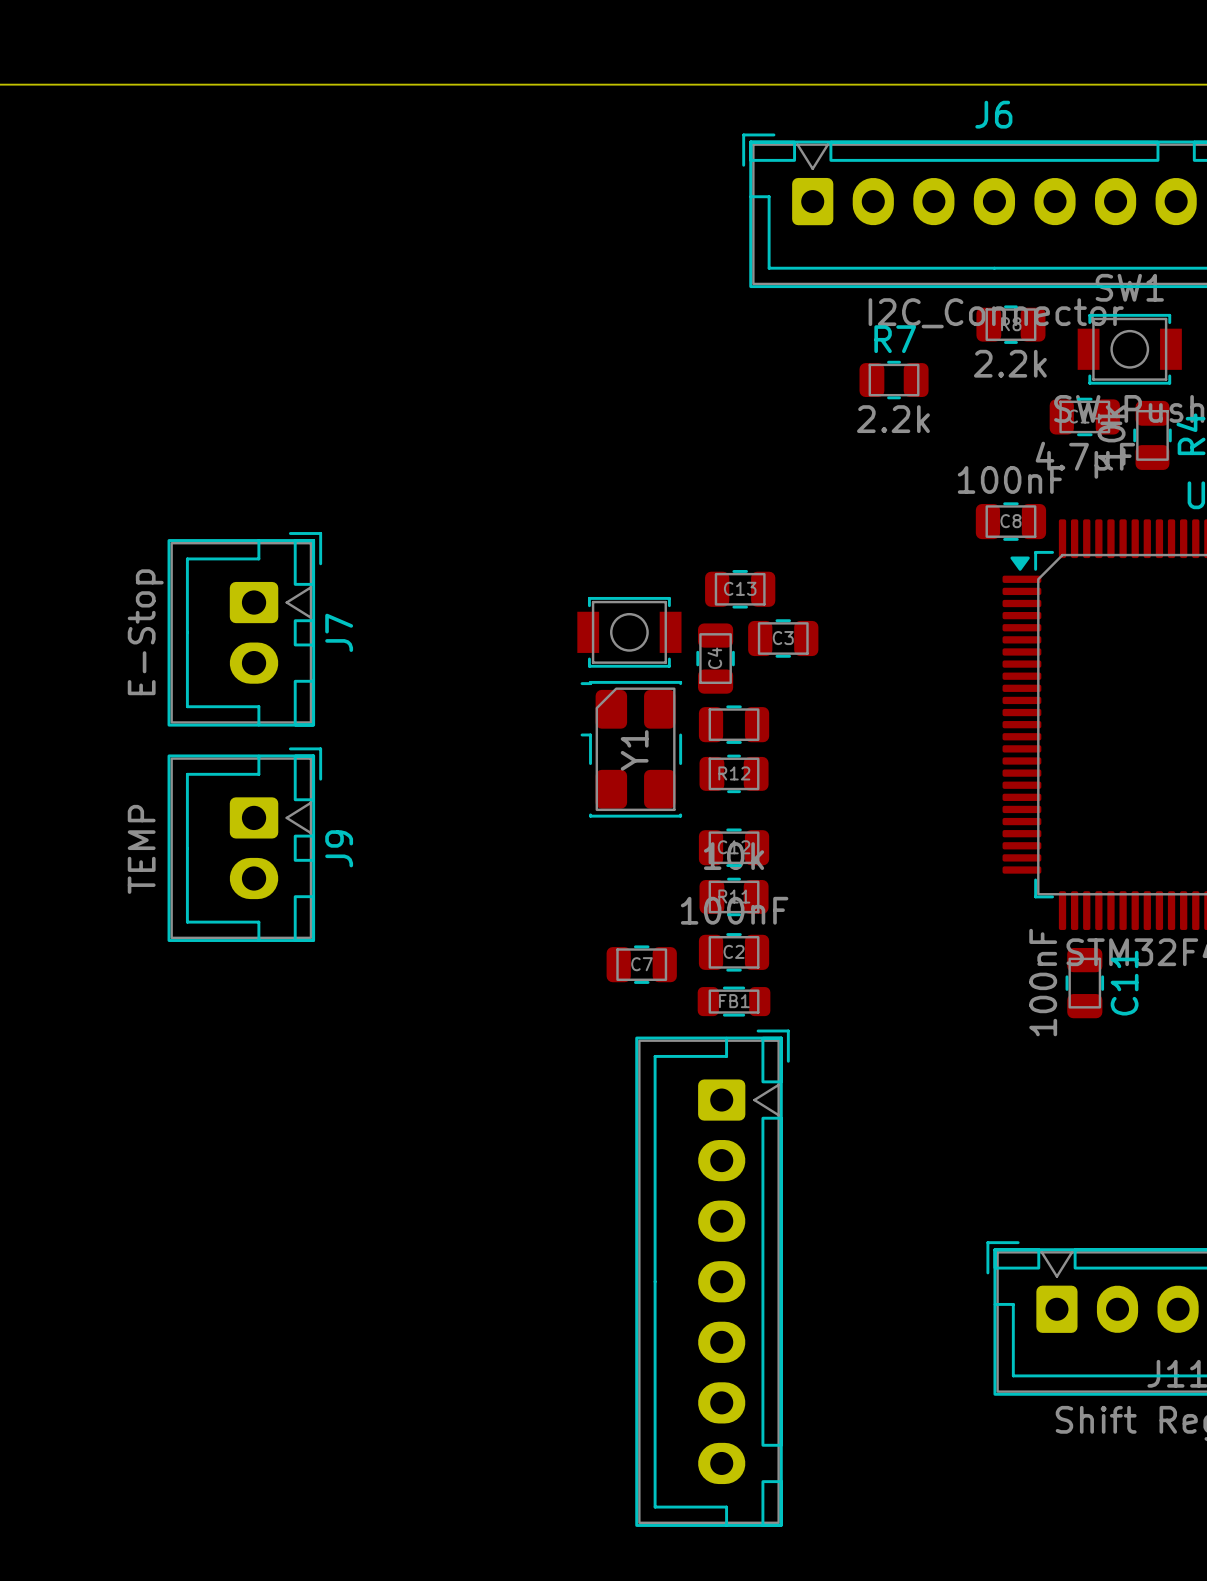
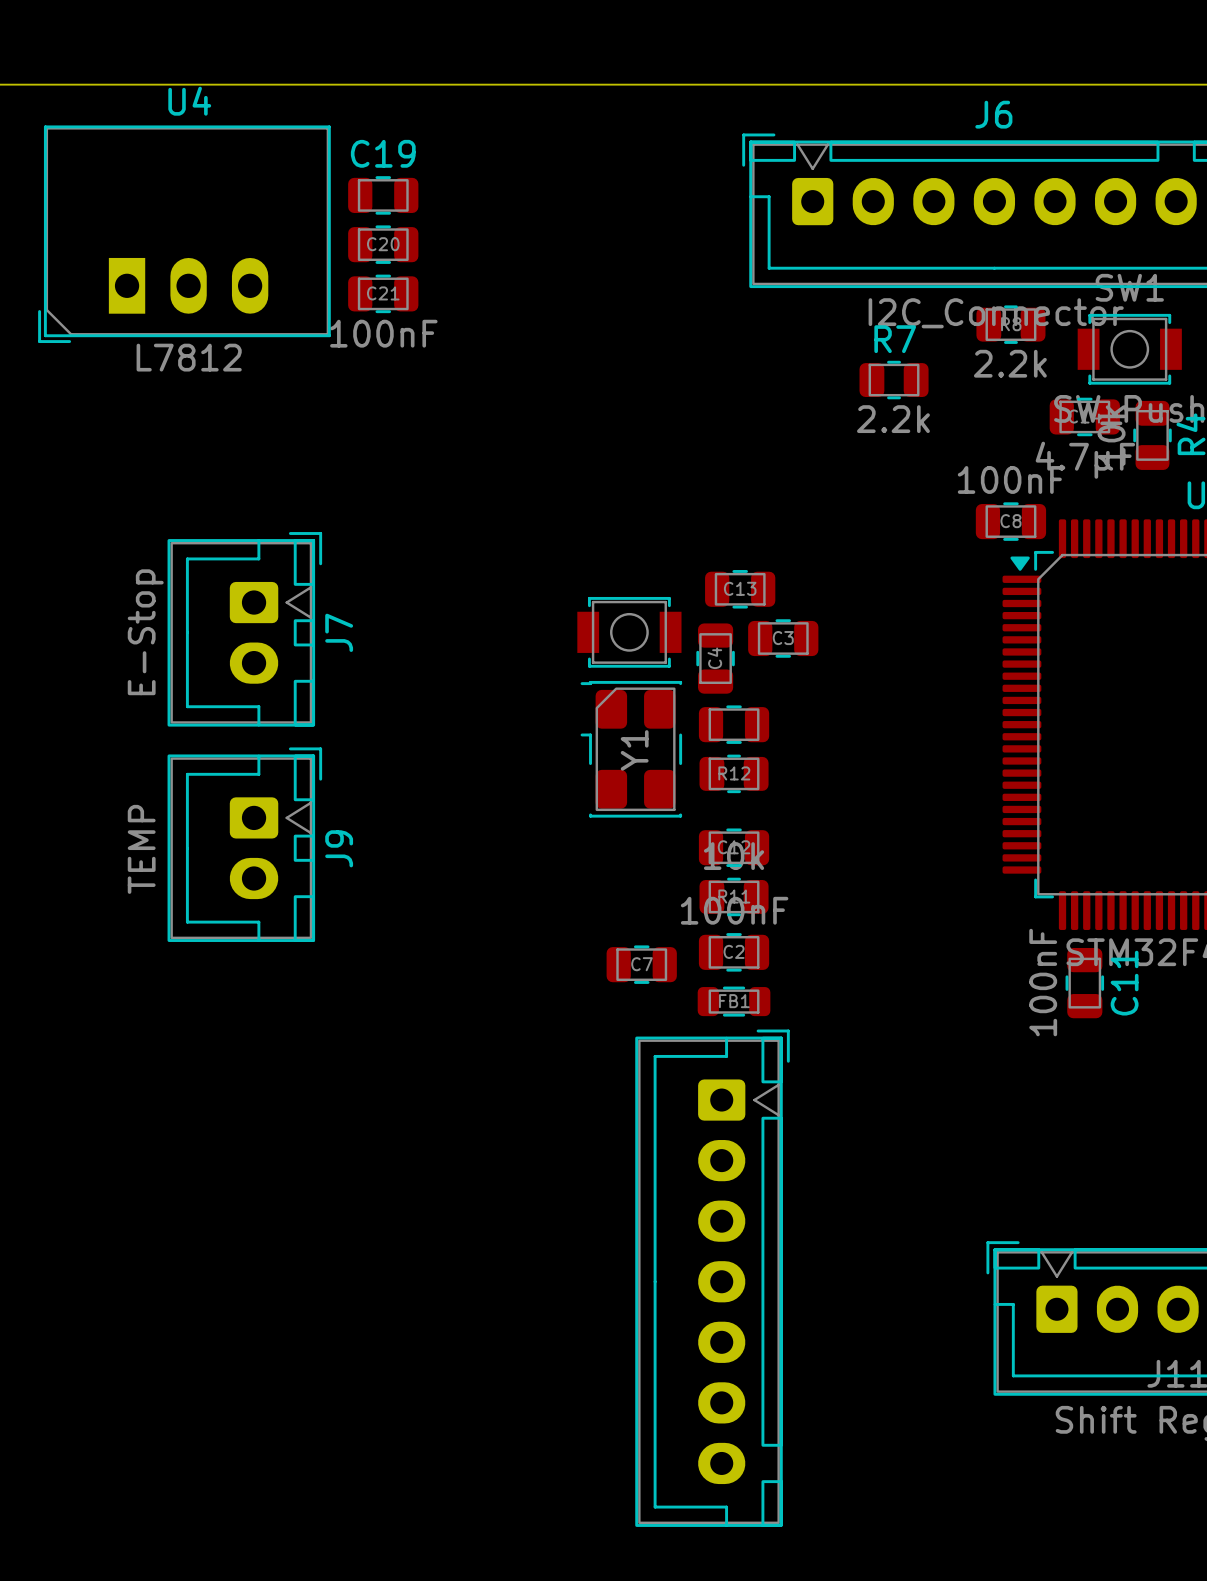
C19: none -> (383, 195)
U4: none -> L7812 (184, 234)
C20: none -> (383, 244)
C21: none -> 100nF (383, 293)

